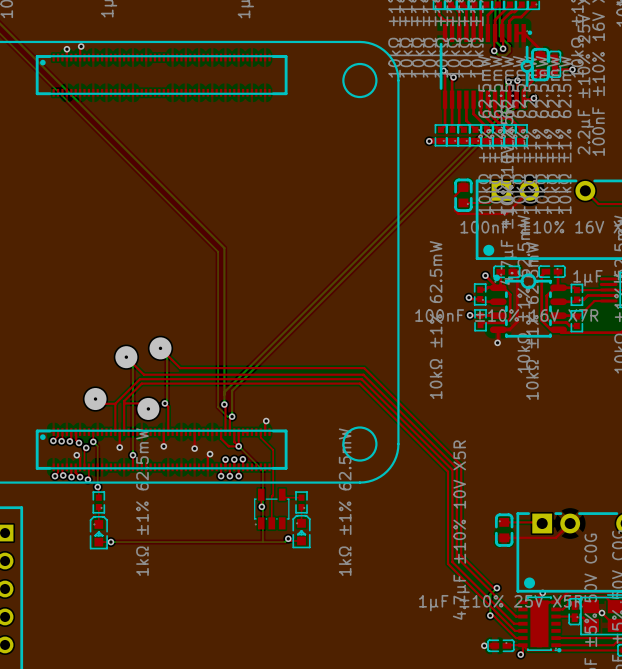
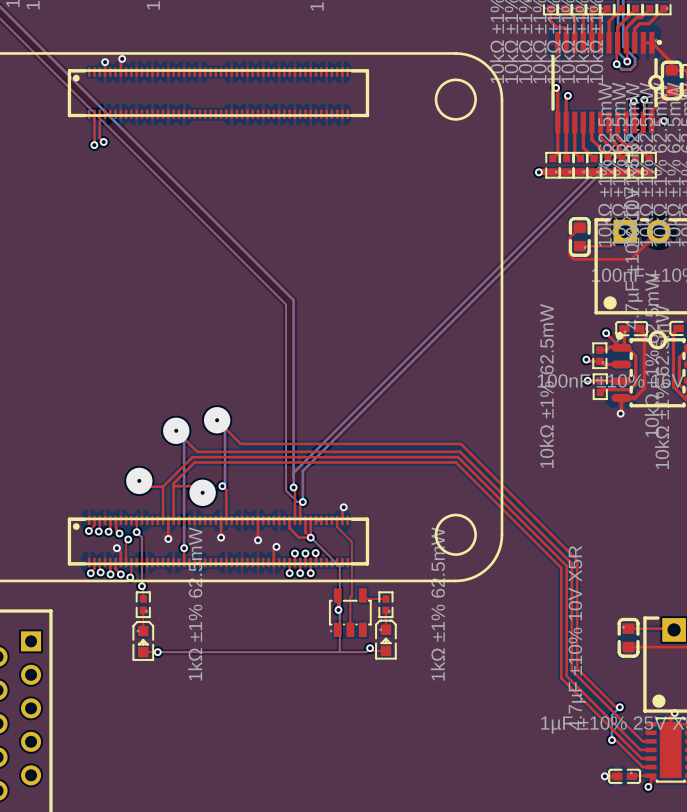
top track: none -> (94, 114) (94, 144)
top track: none -> (99, 114) (99, 138) (103, 142)
via: none -> (103, 142)
via: none -> (94, 145)

